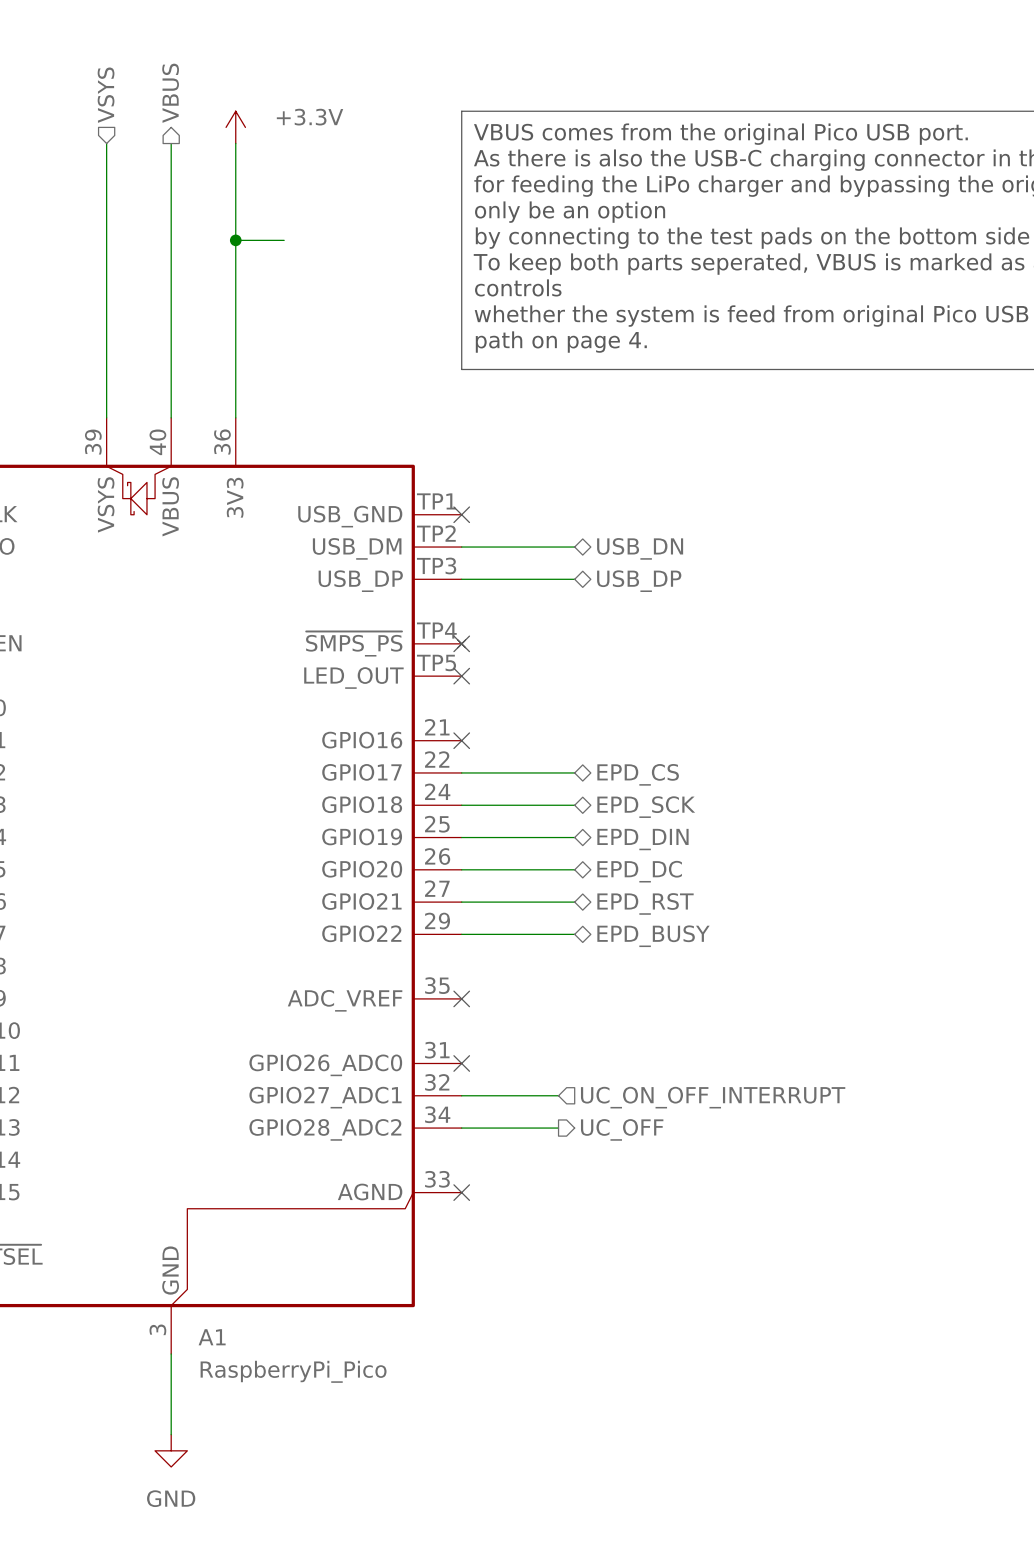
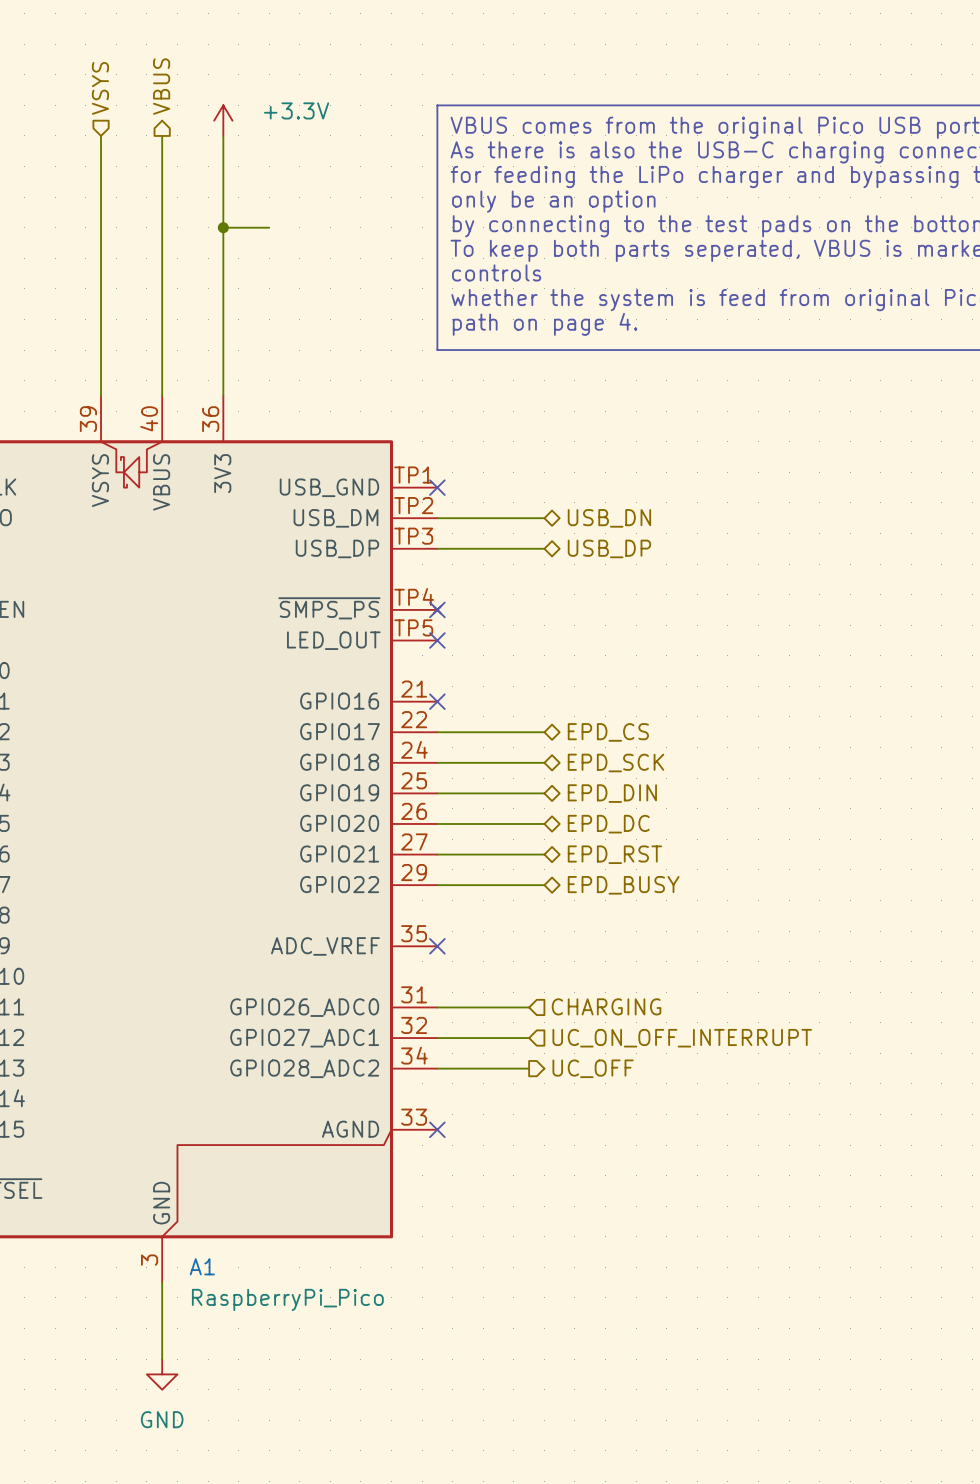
hierarchical label: none -> CHARGING (606, 1006)
wire: none -> (437, 1007) (529, 1007)
no-connect mark: (461, 1063) -> none

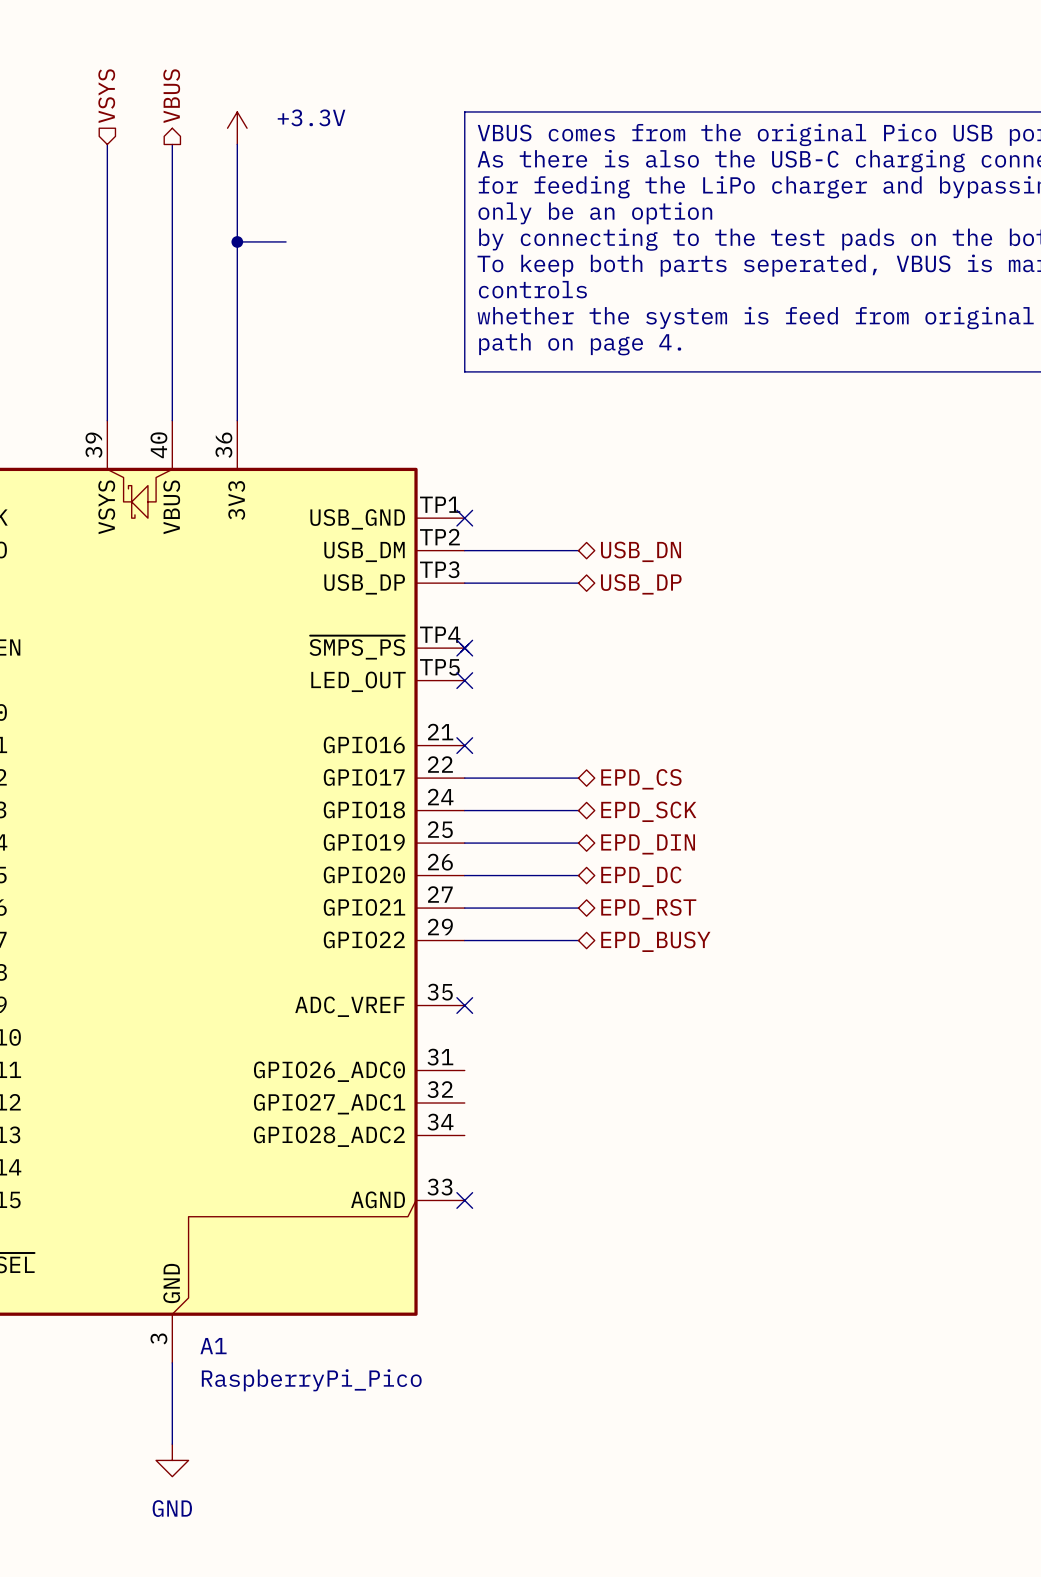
hierarchical label: CHARGING (606, 1006) -> none
wire: (437, 1007) (529, 1007) -> none
wire: (437, 1038) (529, 1038) -> none
hierarchical label: UC_ON_OFF_INTERRUPT (682, 1038) -> none
wire: (437, 1068) (529, 1068) -> none
hierarchical label: UC_OFF (593, 1068) -> none

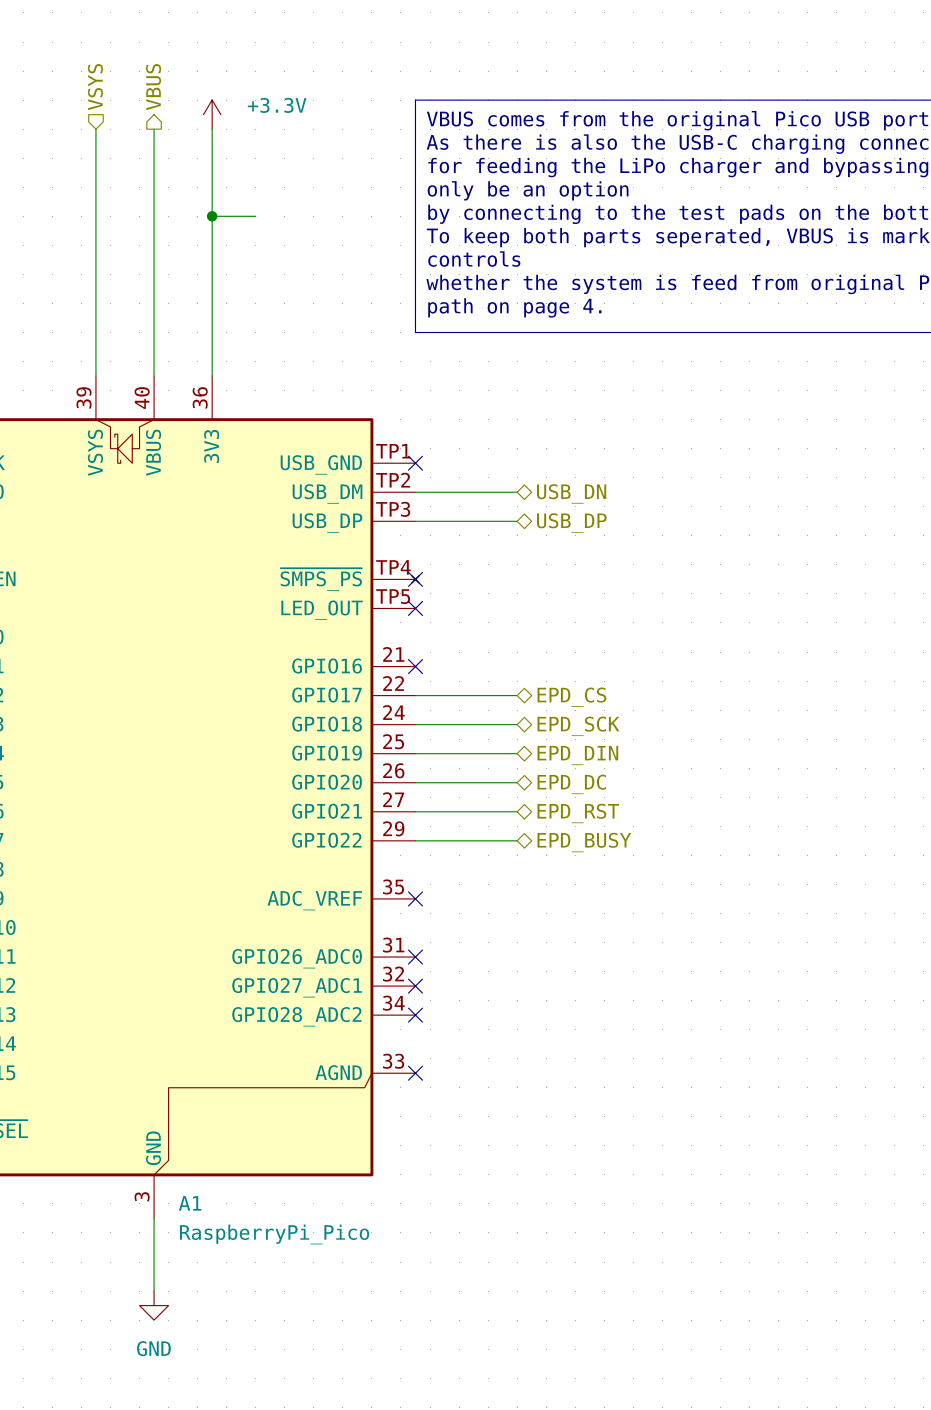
no-connect mark: none -> (415, 957)
no-connect mark: none -> (415, 986)
no-connect mark: none -> (415, 1015)

